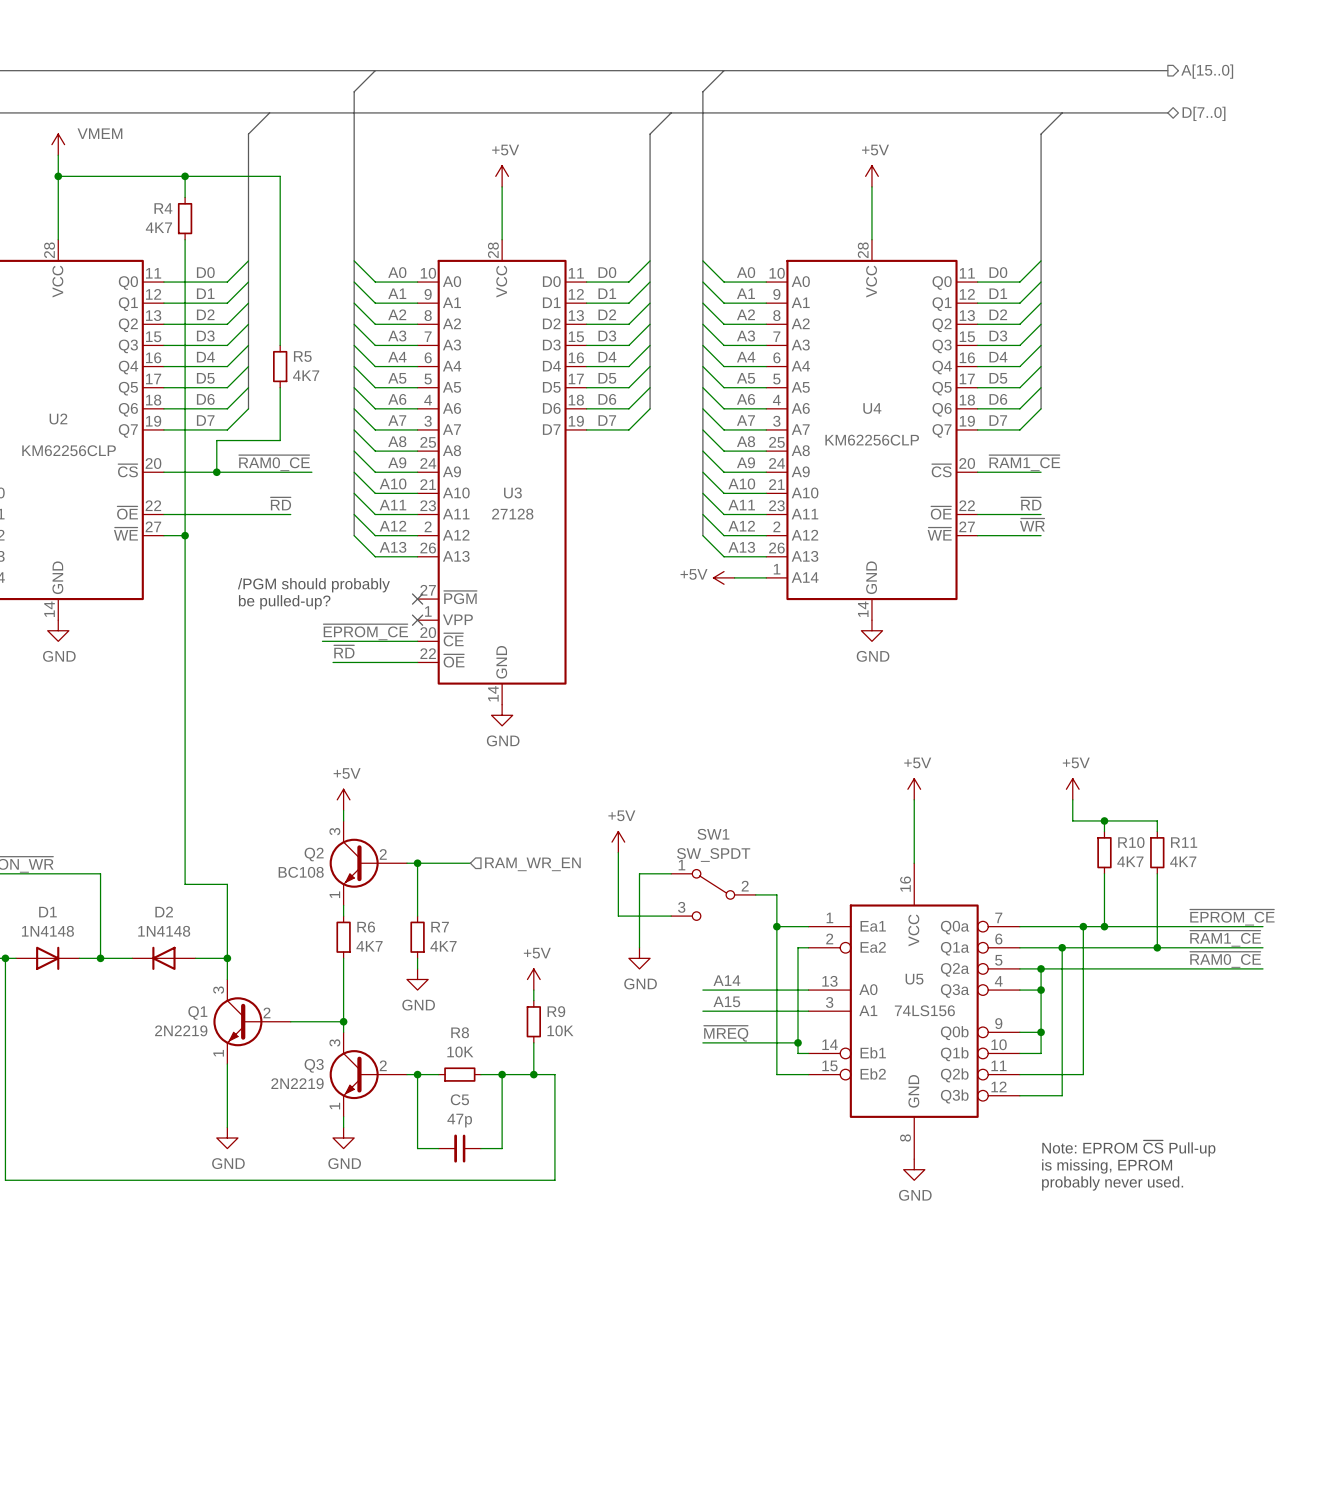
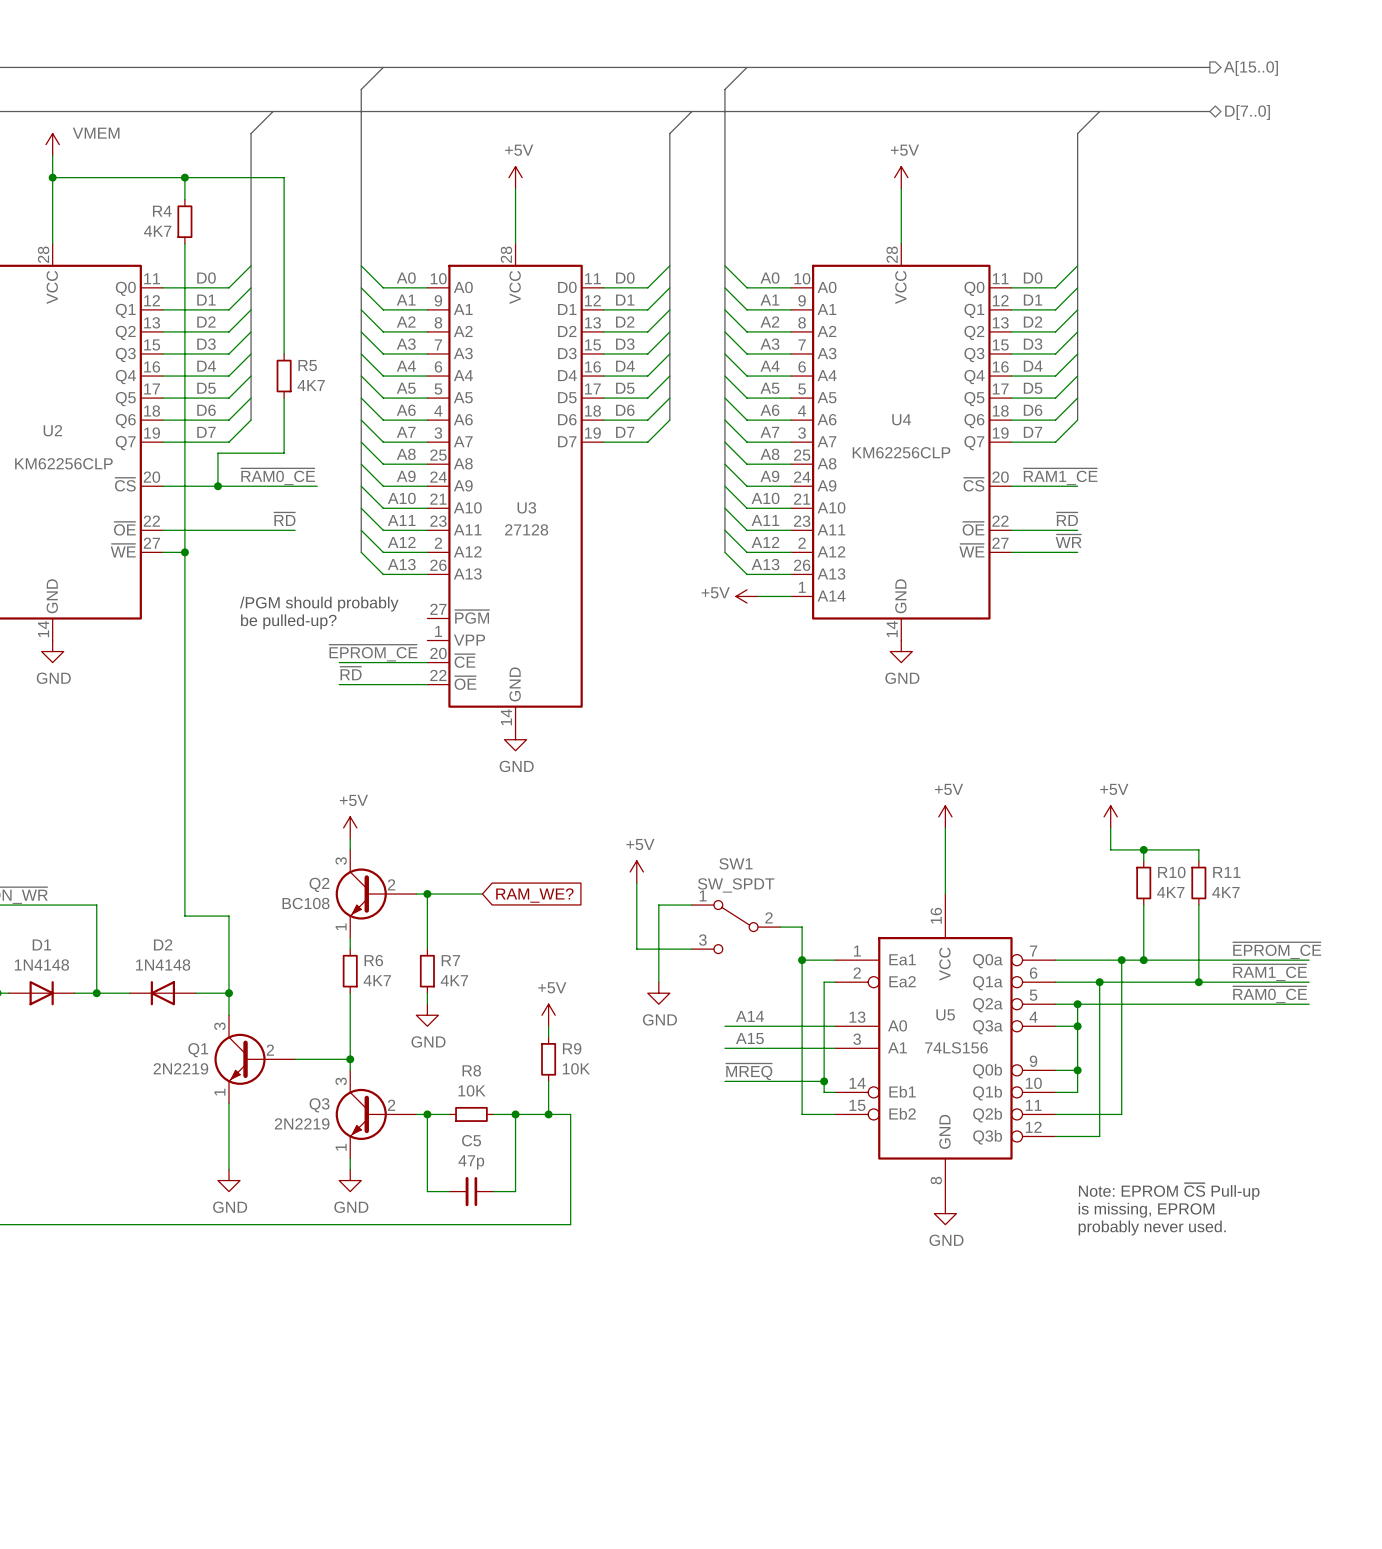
no-connect mark: (417, 599) -> none
no-connect mark: (417, 620) -> none
wire: (322, 641) (333, 641) -> none
global label: none -> RAM_WE? (534, 895)
hierarchical label: RAM_WR_EN (532, 864) -> none

